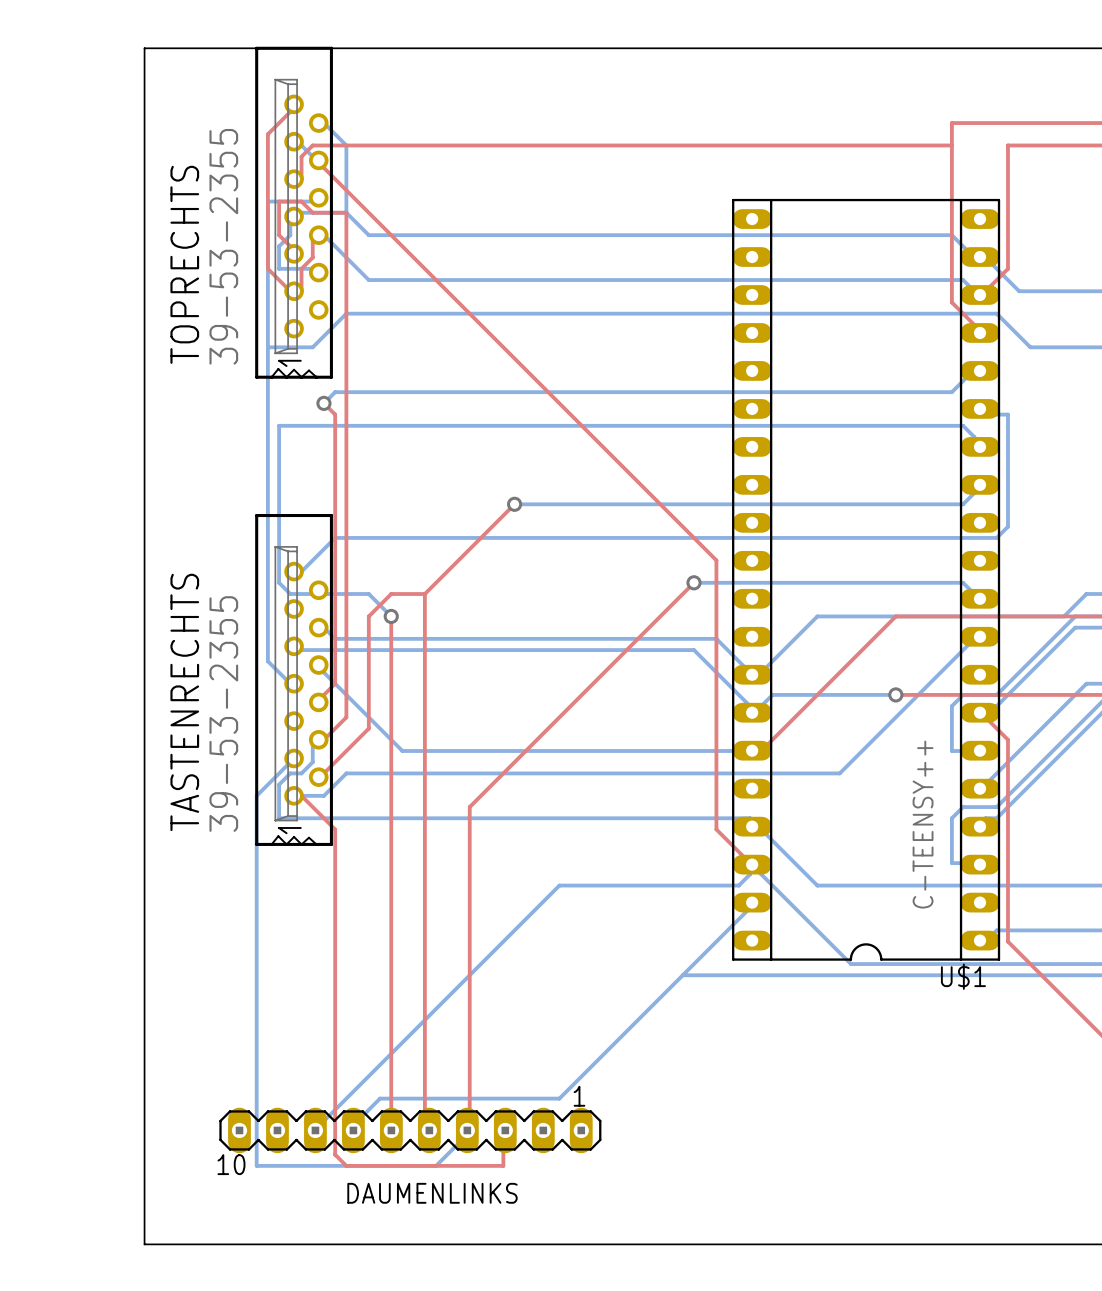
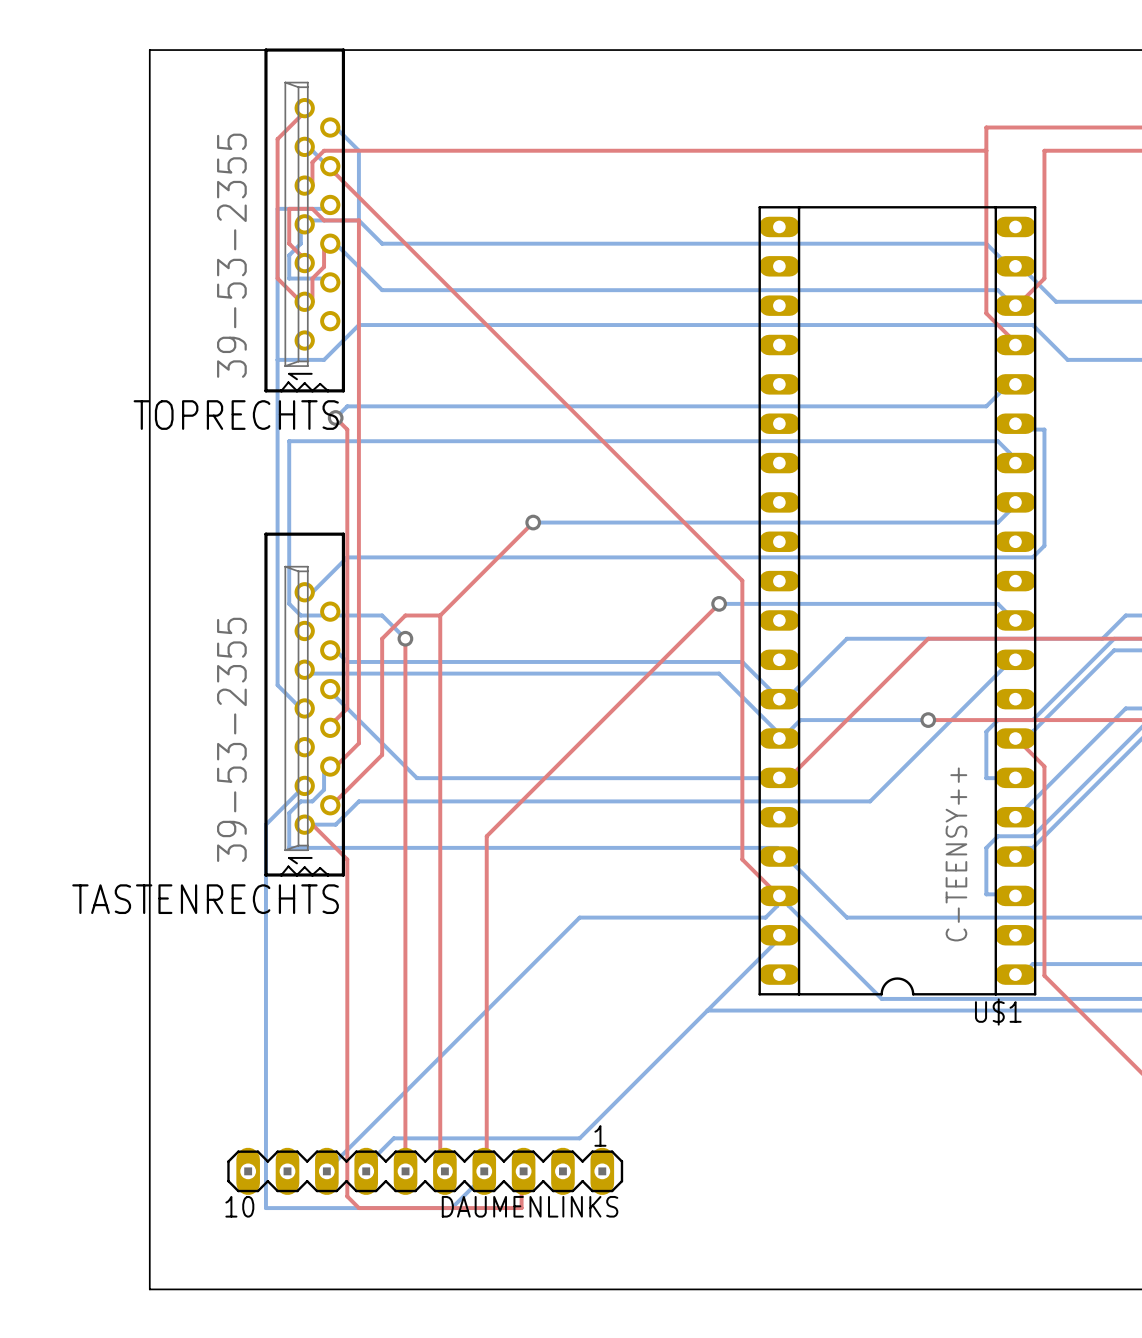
TOPRECHTS name rotation: 0° (184, 264) -> 90° clockwise (236, 415)
TASTENRECHTS name rotation: 0° (184, 702) -> 90° clockwise (205, 899)
DAUMENLINKS name position: DAUMENLINKS (432, 1193) -> DAUMENLINKS (530, 1206)

